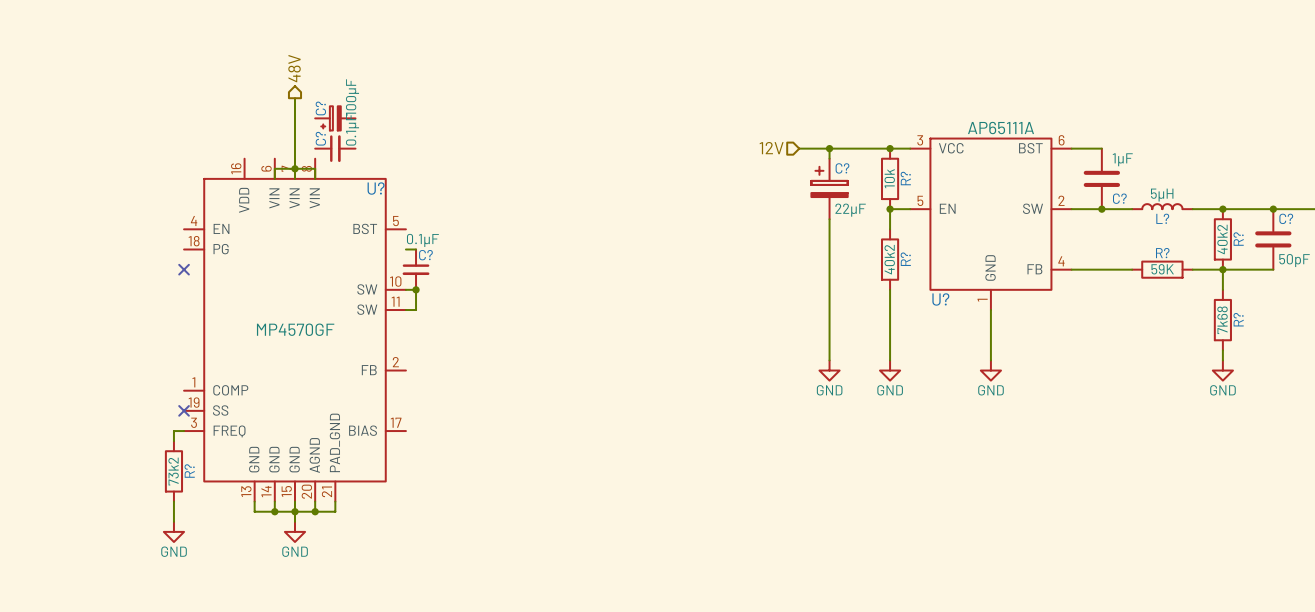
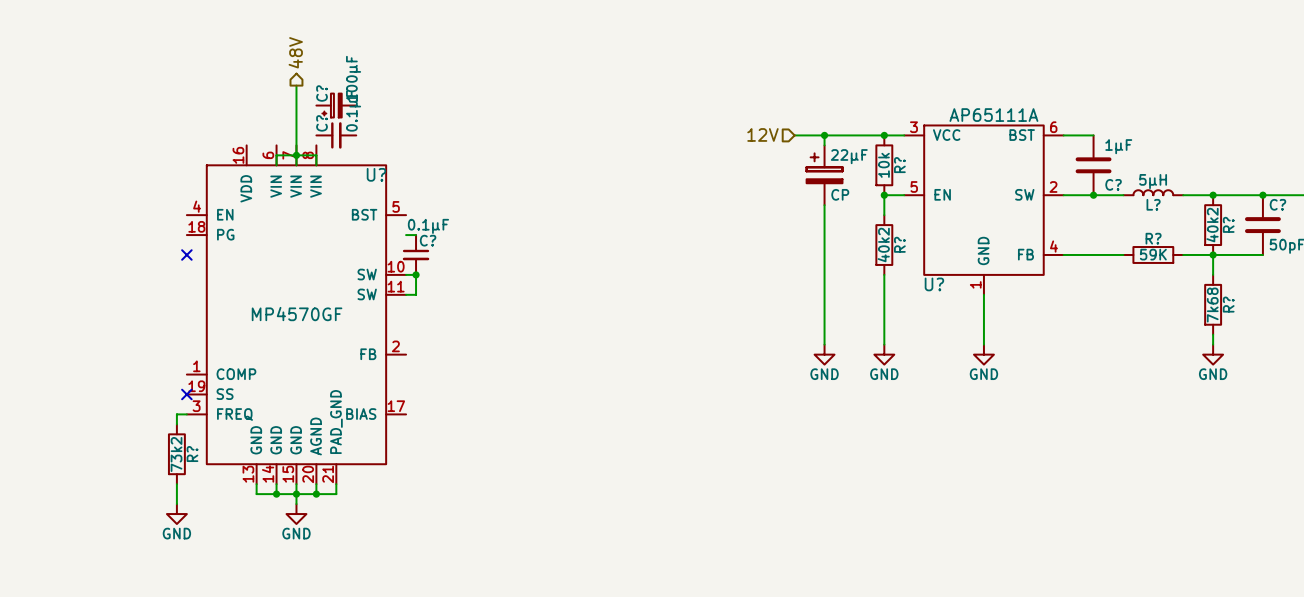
C? name: C? (842, 168) -> 22μF (849, 156)
C? value: 22μF (850, 210) -> CP (840, 194)

